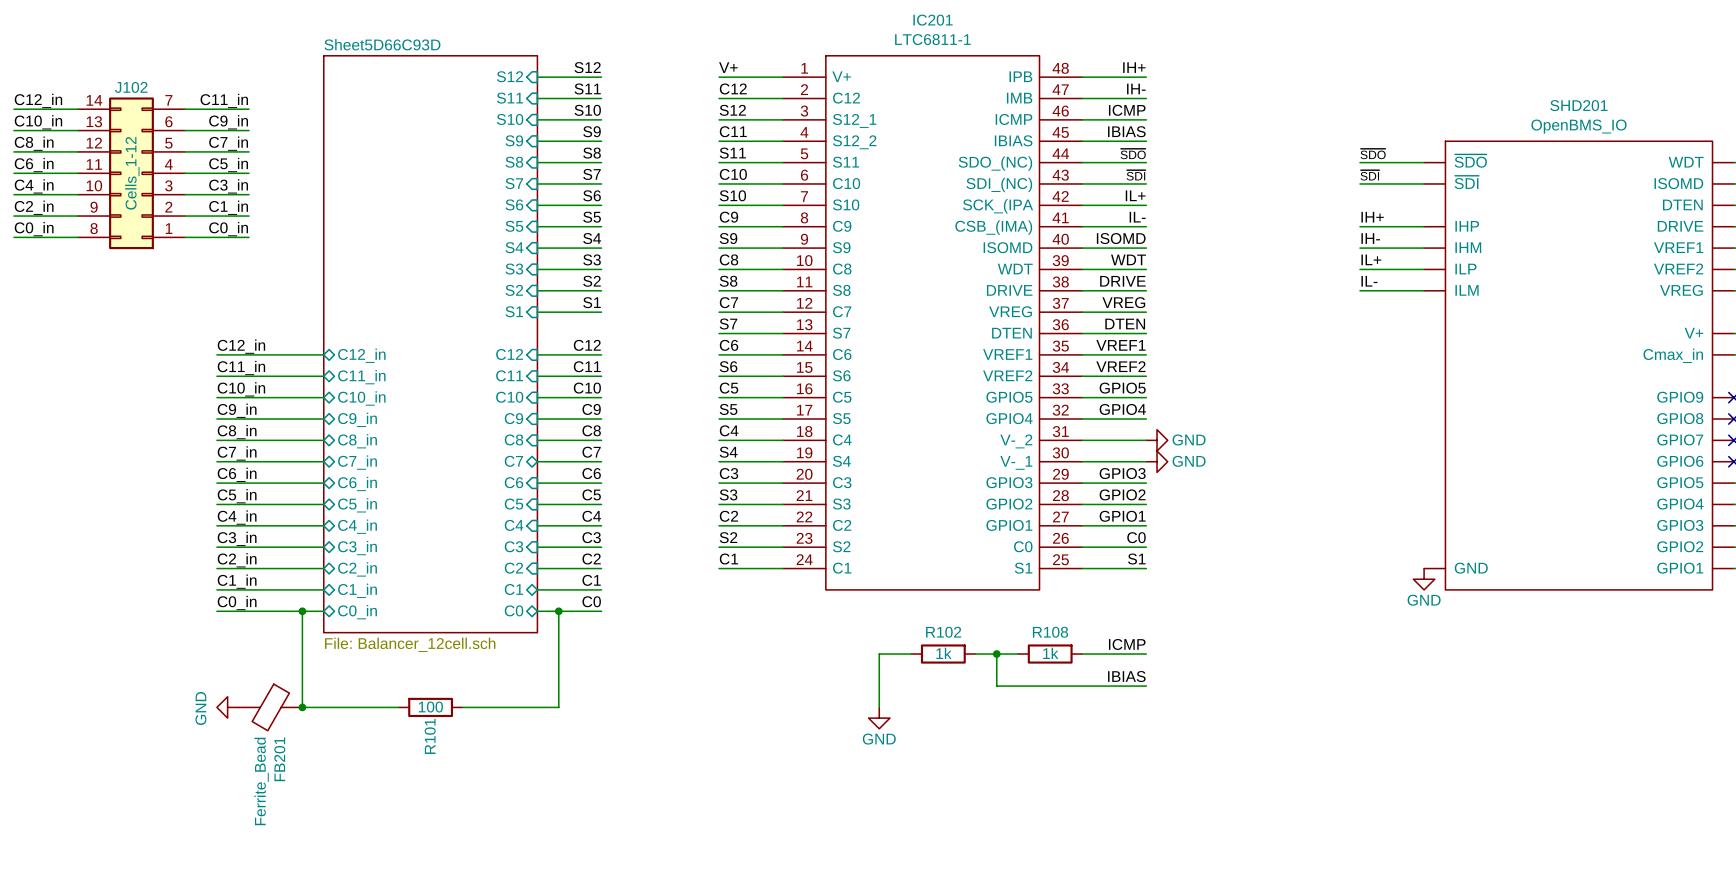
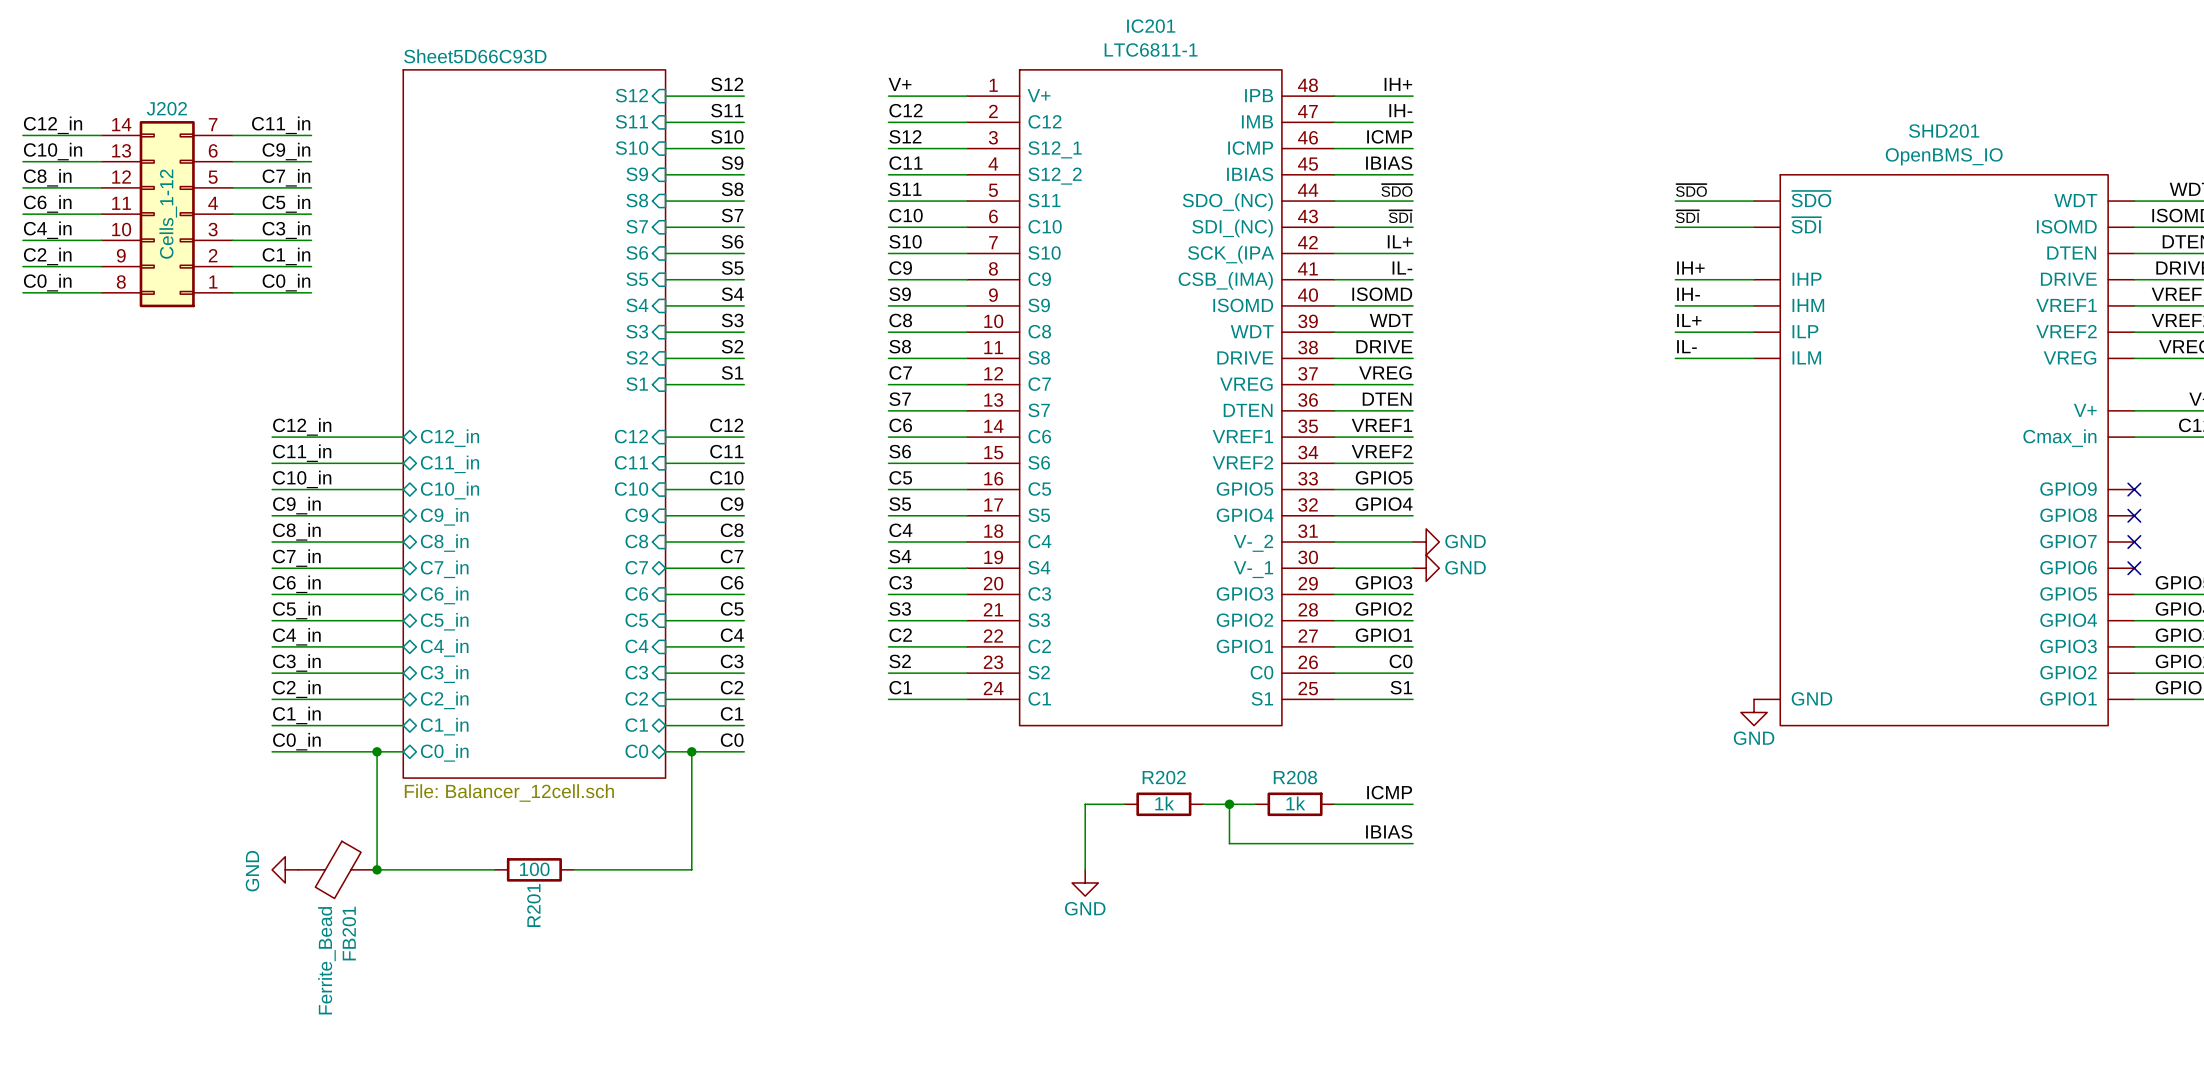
J102 name: J102 (131, 87) -> J202 (166, 108)
R102 name: R102 (943, 632) -> R202 (1164, 777)
R108 name: R108 (1050, 632) -> R208 (1295, 777)
R101 name: R101 (430, 736) -> R201 (533, 905)

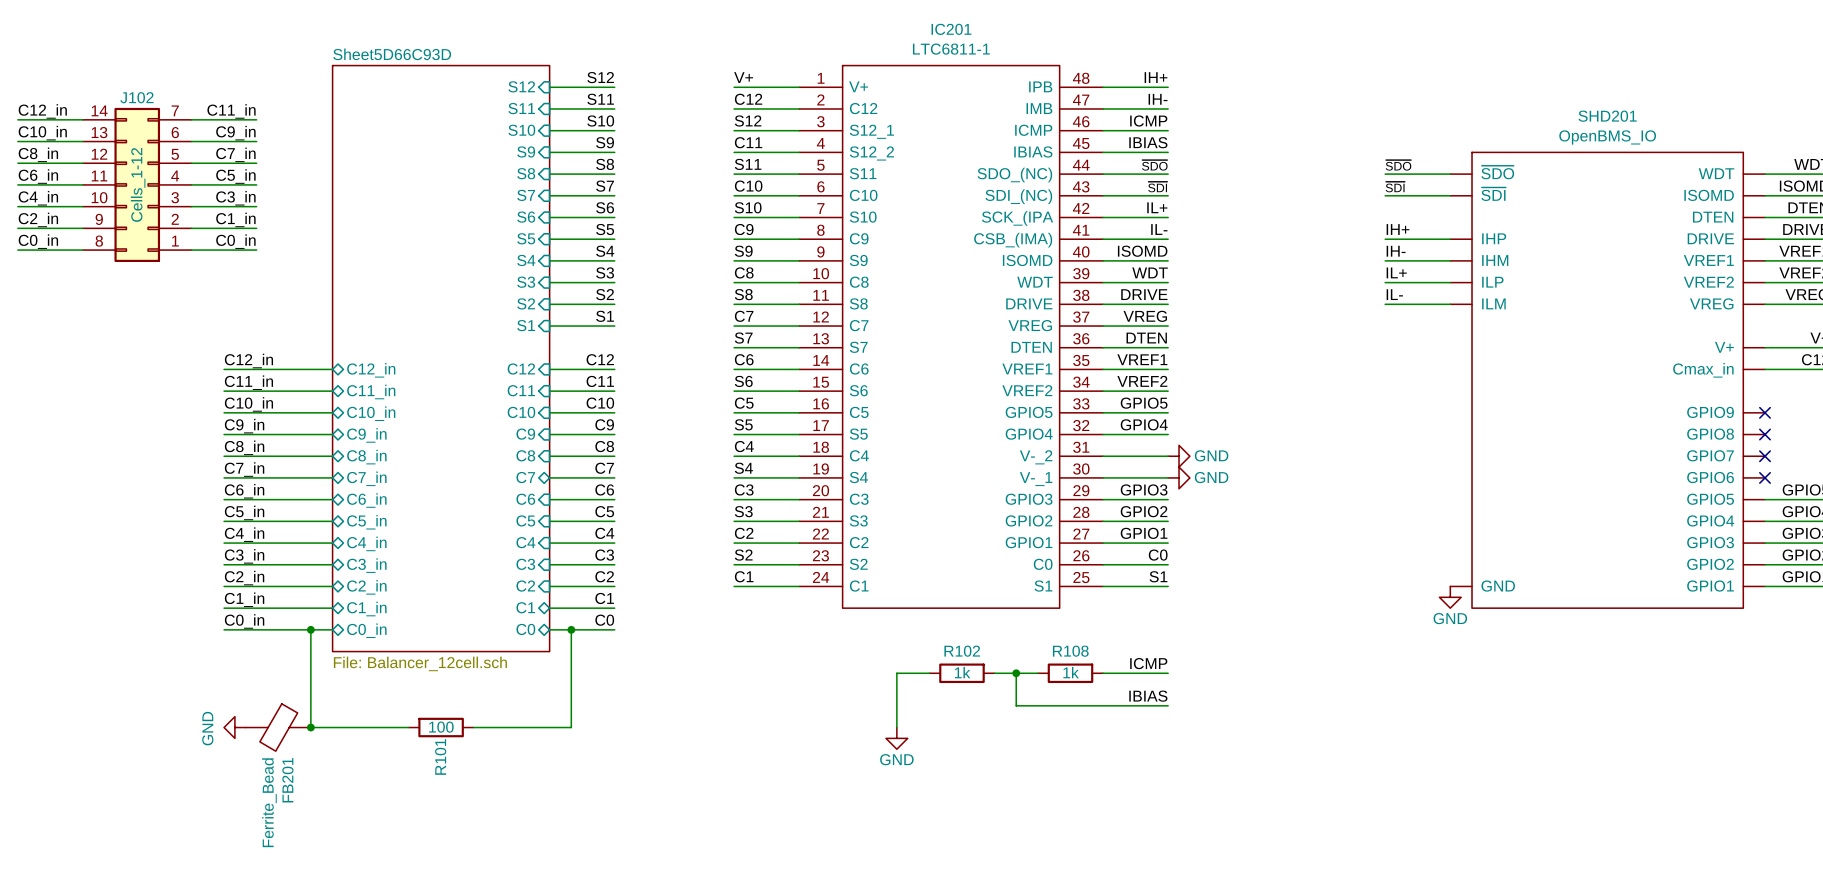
J202 name: J202 (166, 108) -> J102 (136, 97)
R202 name: R202 (1164, 777) -> R102 (962, 651)
R208 name: R208 (1295, 777) -> R108 (1070, 651)
R201 name: R201 (533, 905) -> R101 (440, 756)

